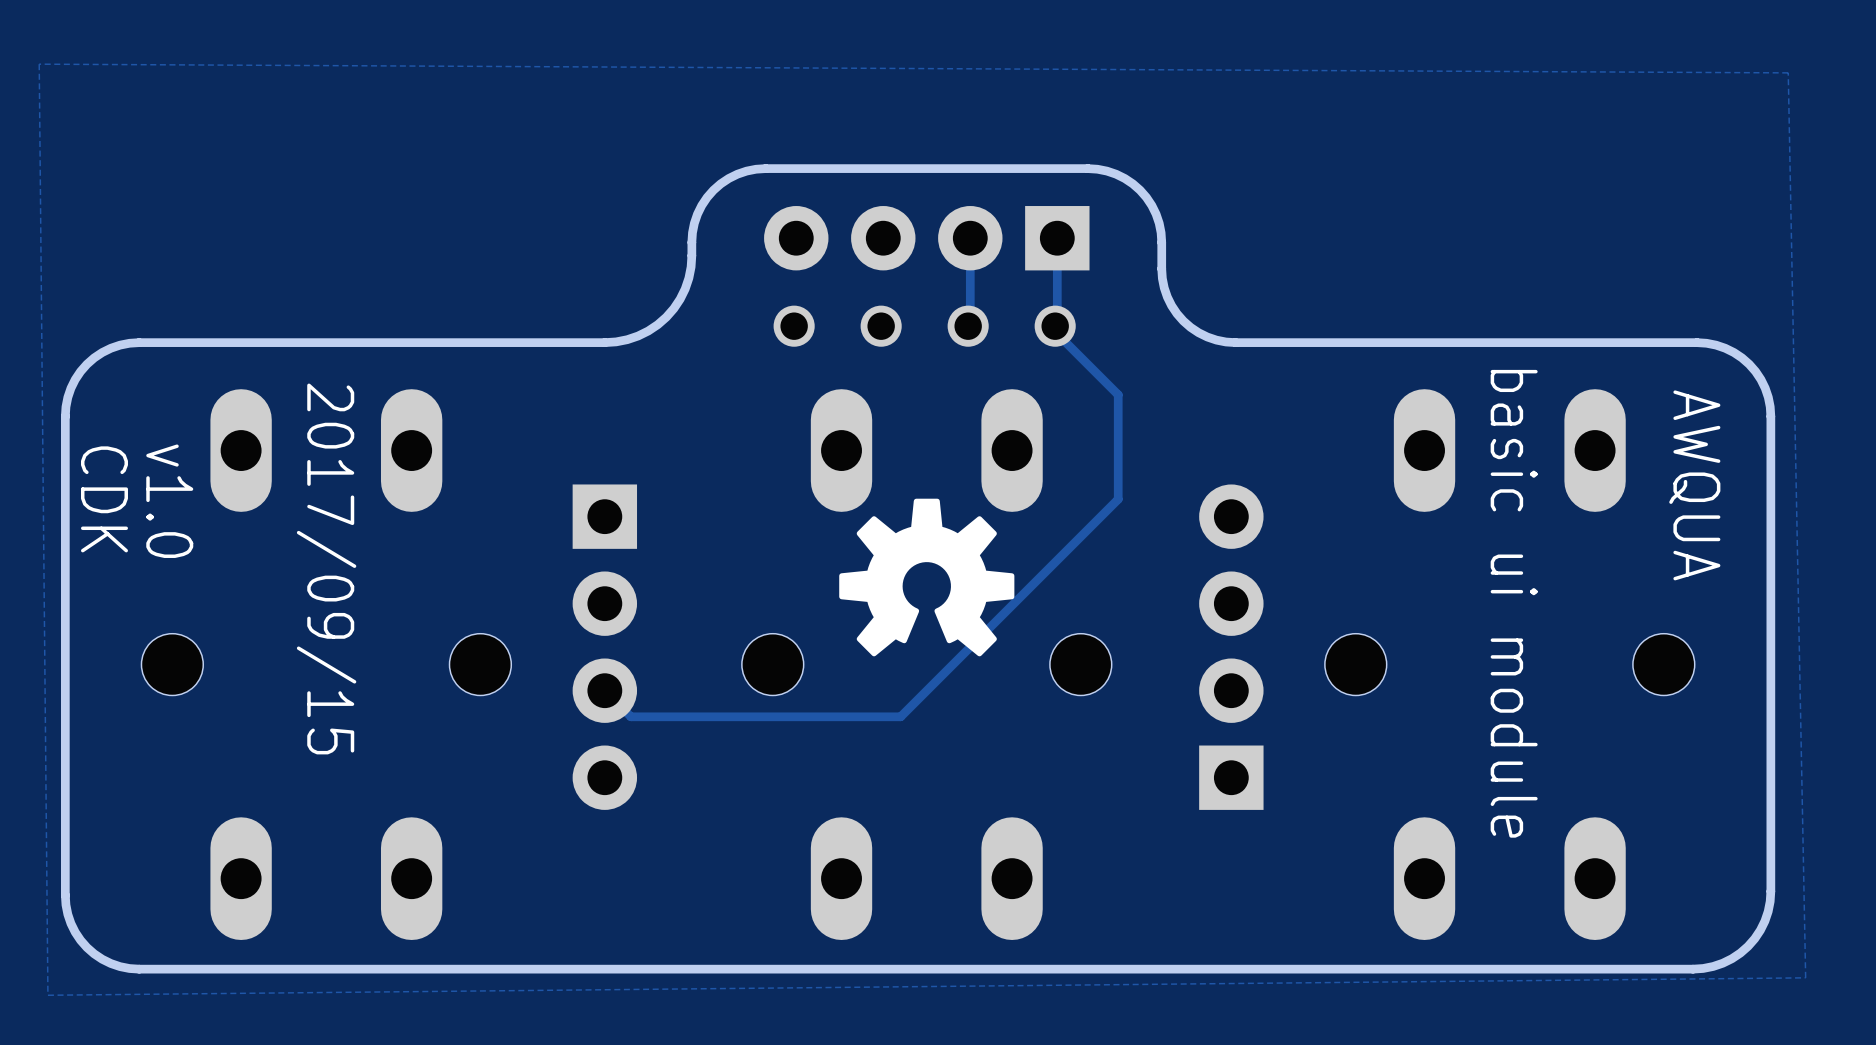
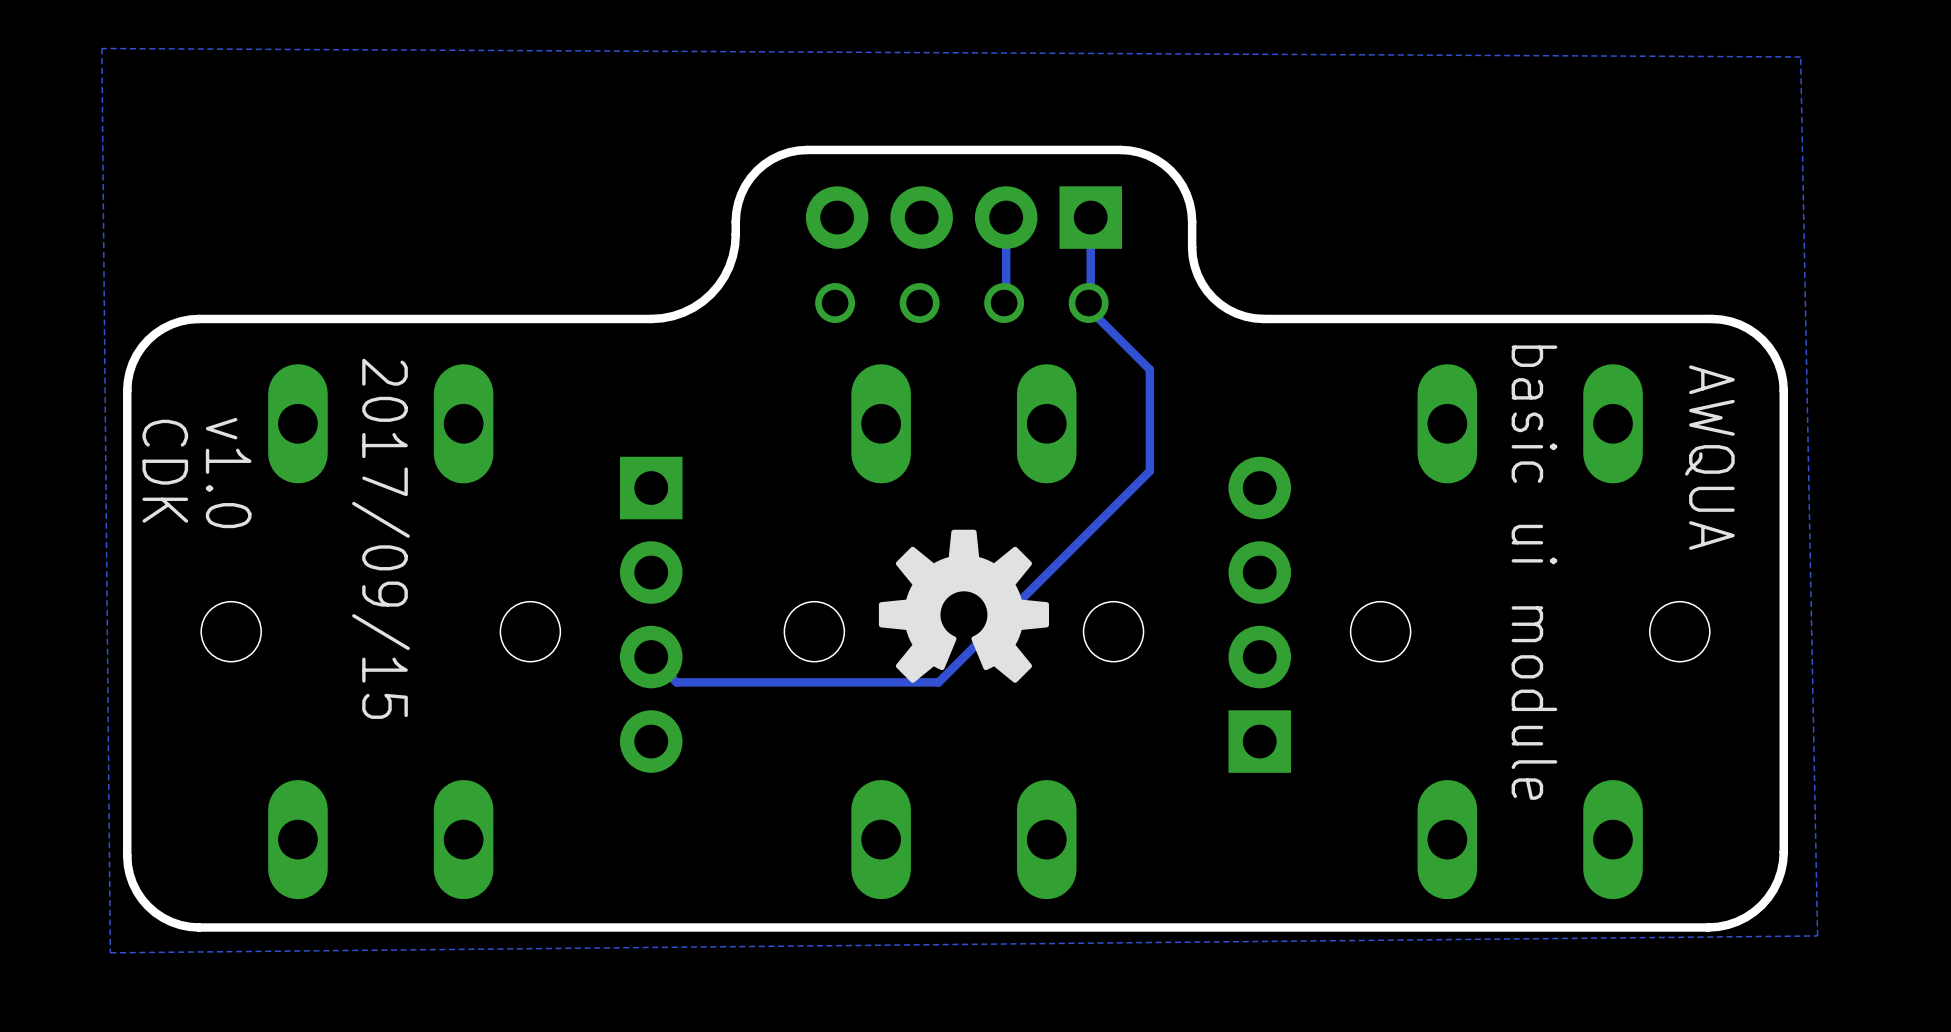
drawing position: (926, 577) -> (963, 606)

